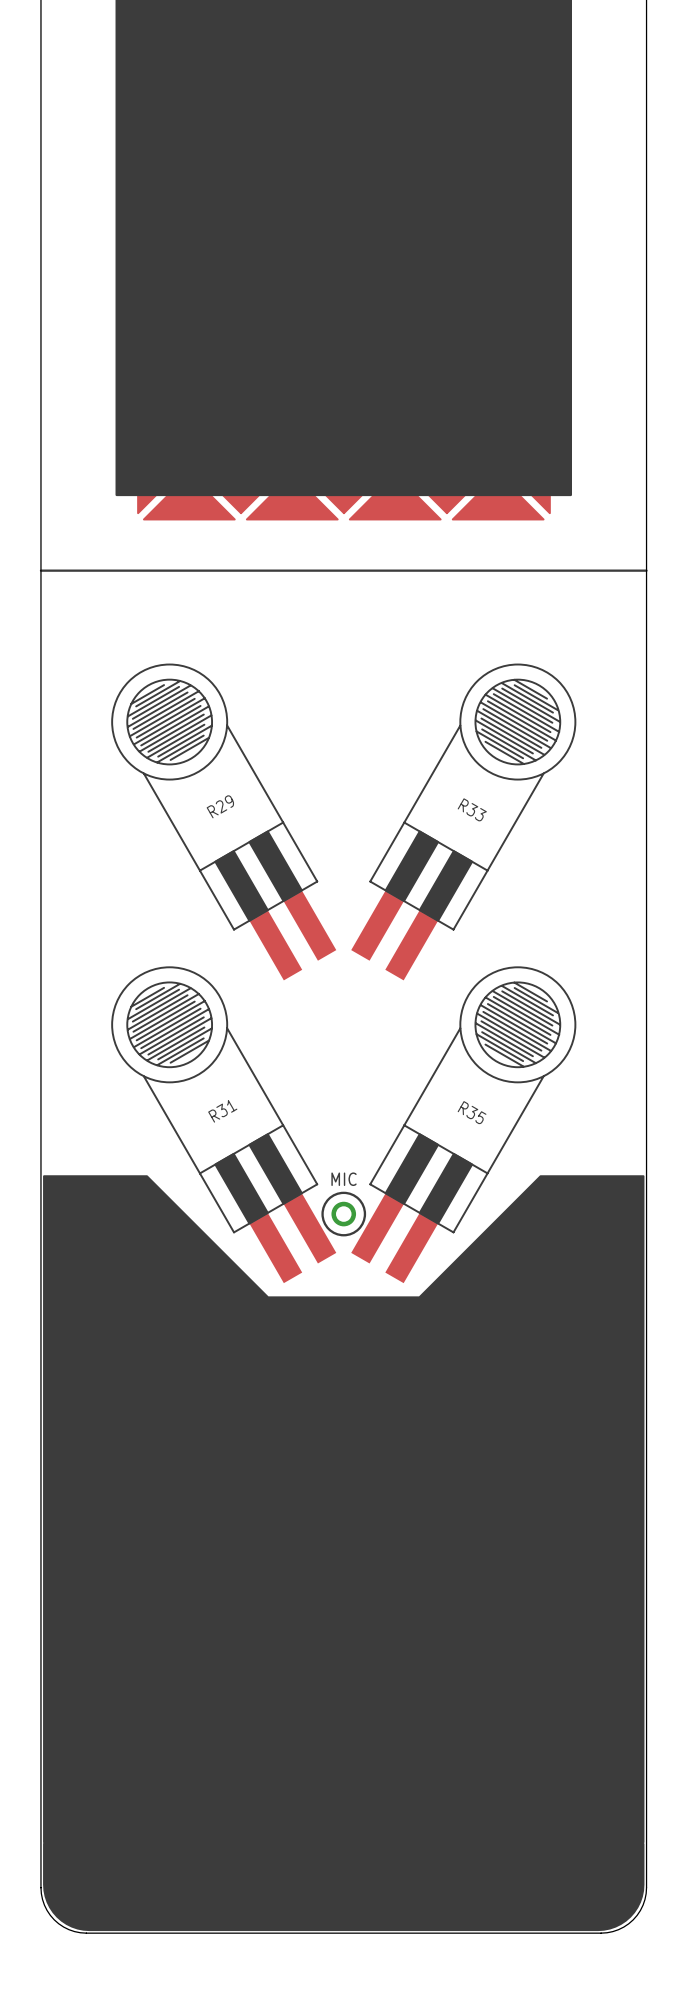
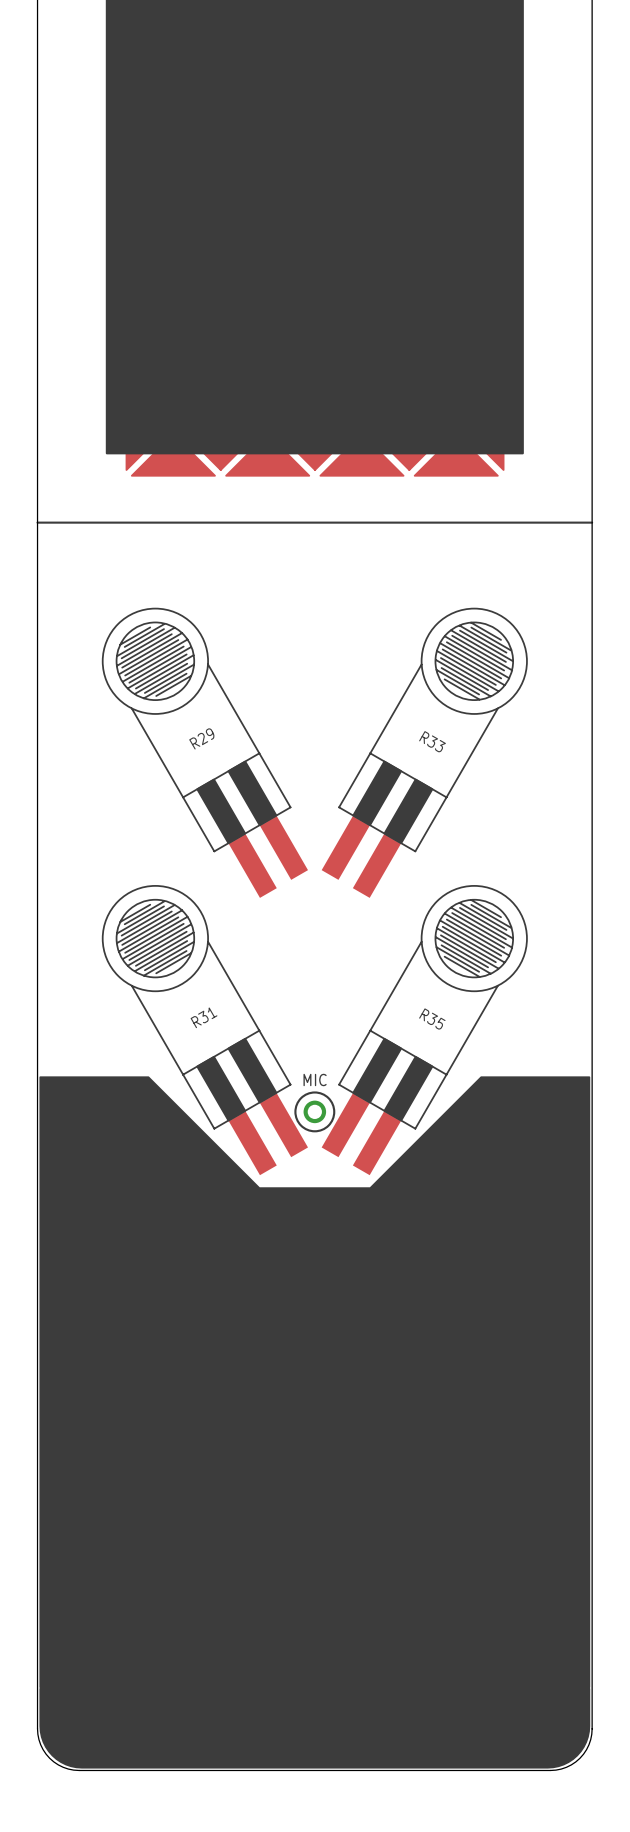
drawing shape: [43, 1175, 645, 1844] -> [39, 1076, 591, 1689]

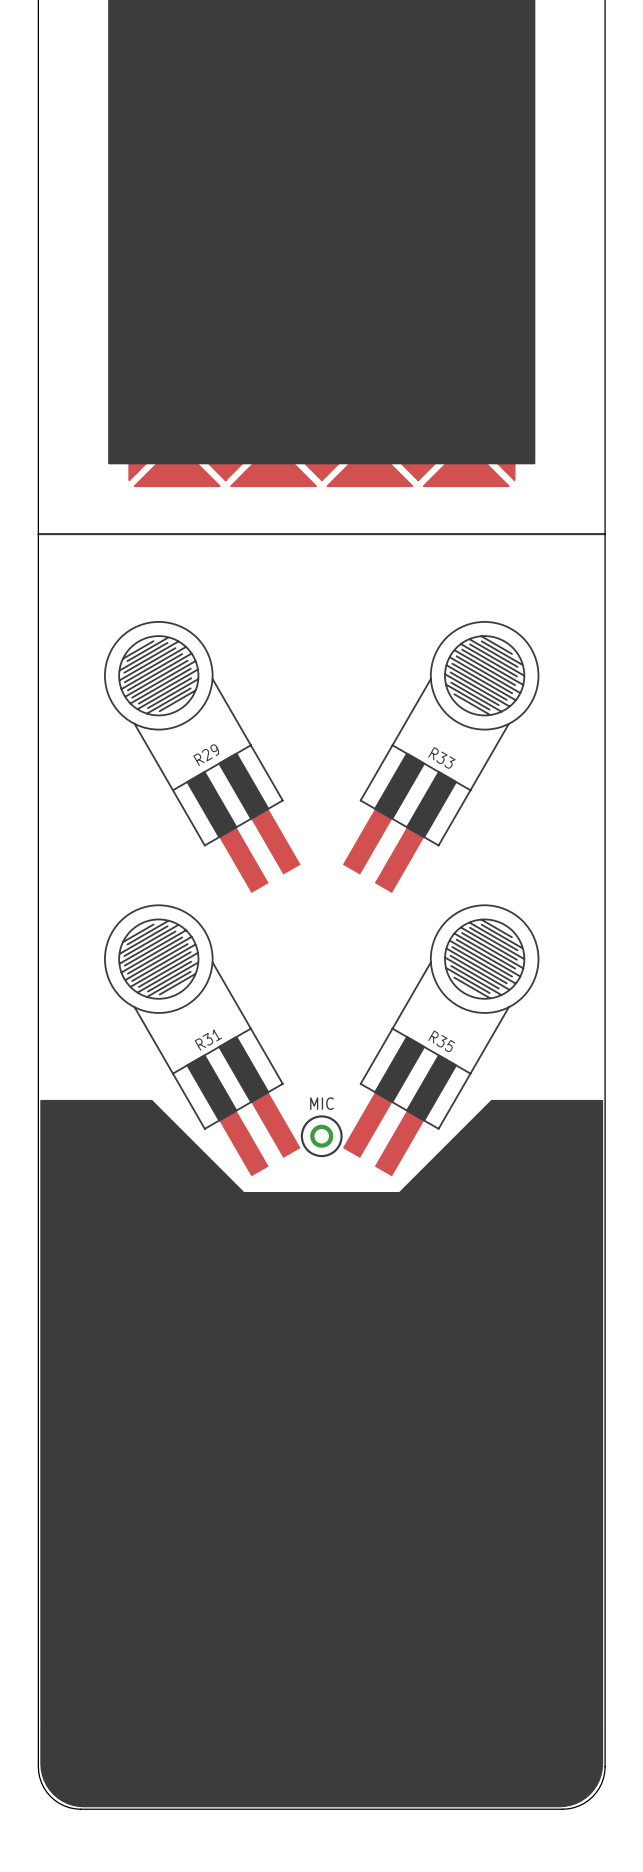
R29 footprint: [101, 607, 308, 898] -> [104, 621, 301, 893]
R33 footprint: [321, 607, 528, 898] -> [342, 621, 540, 893]
R31 footprint: [101, 885, 308, 1176] -> [104, 904, 301, 1177]
R35 footprint: [321, 885, 528, 1176] -> [342, 904, 540, 1177]
drawing shape: [39, 1076, 591, 1689] -> [40, 1099, 604, 1726]

